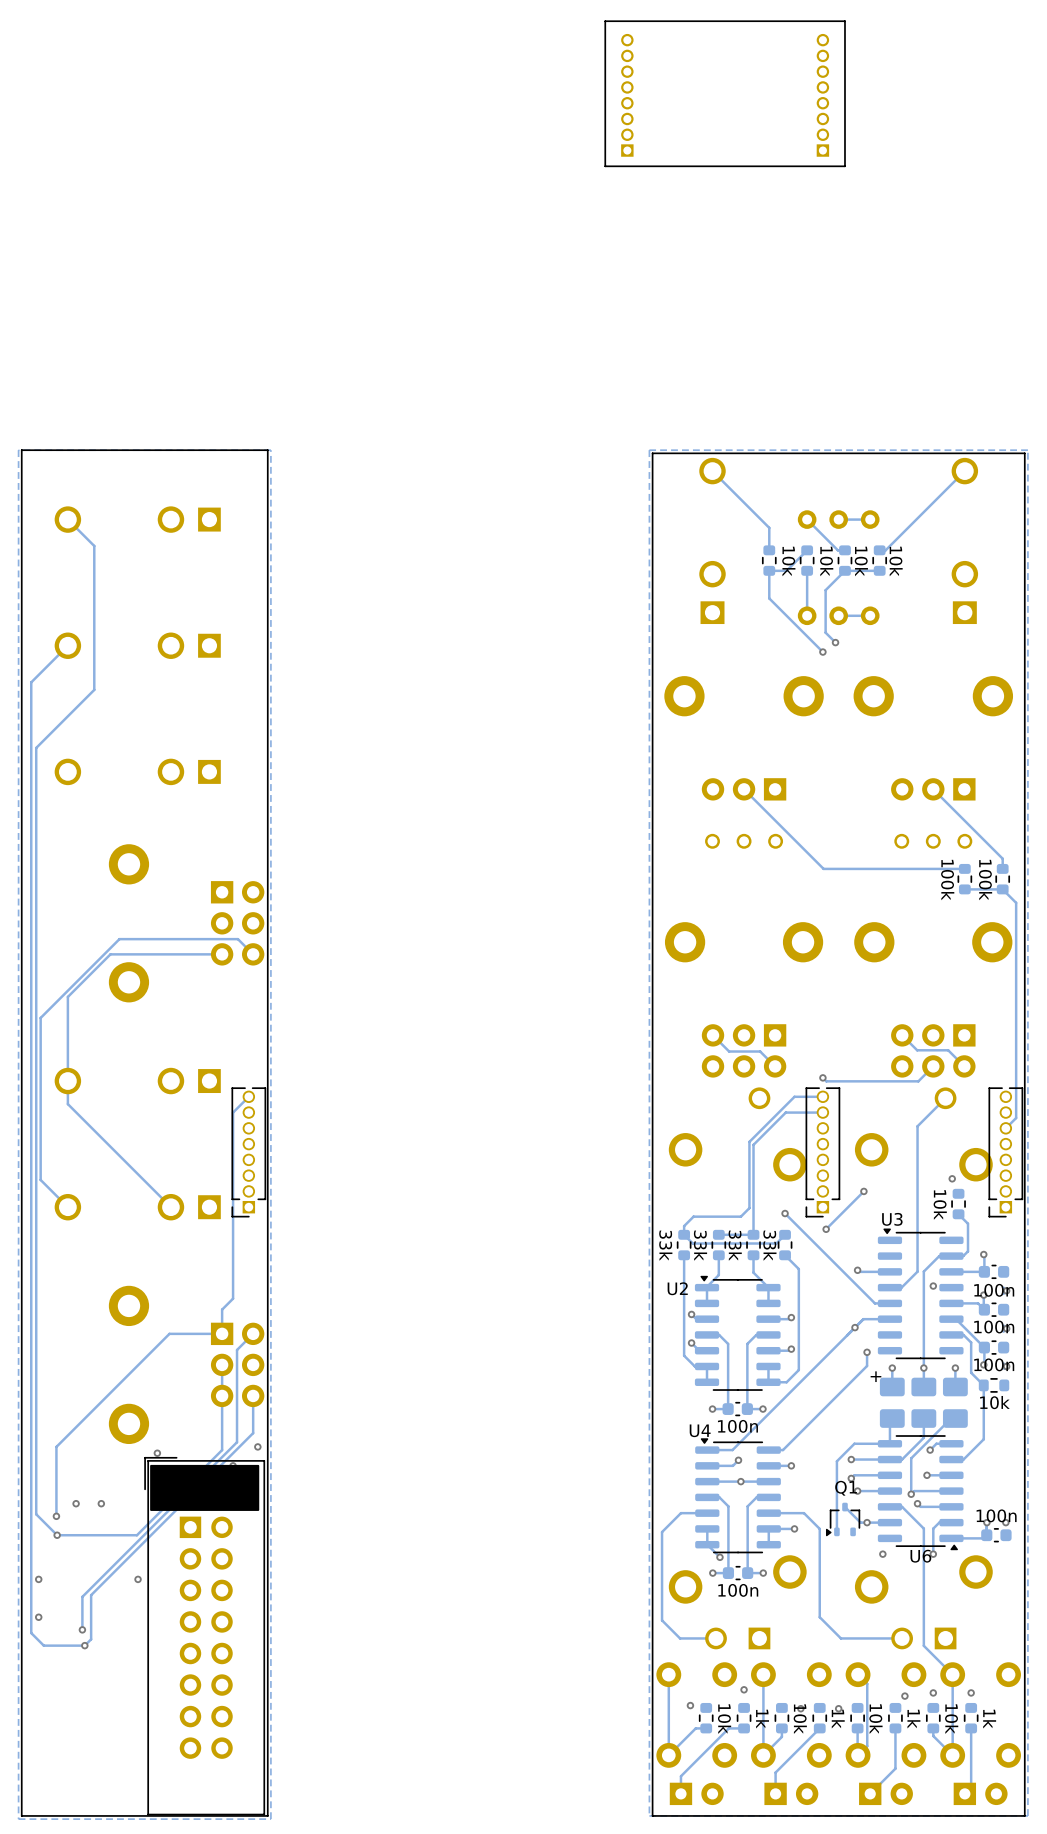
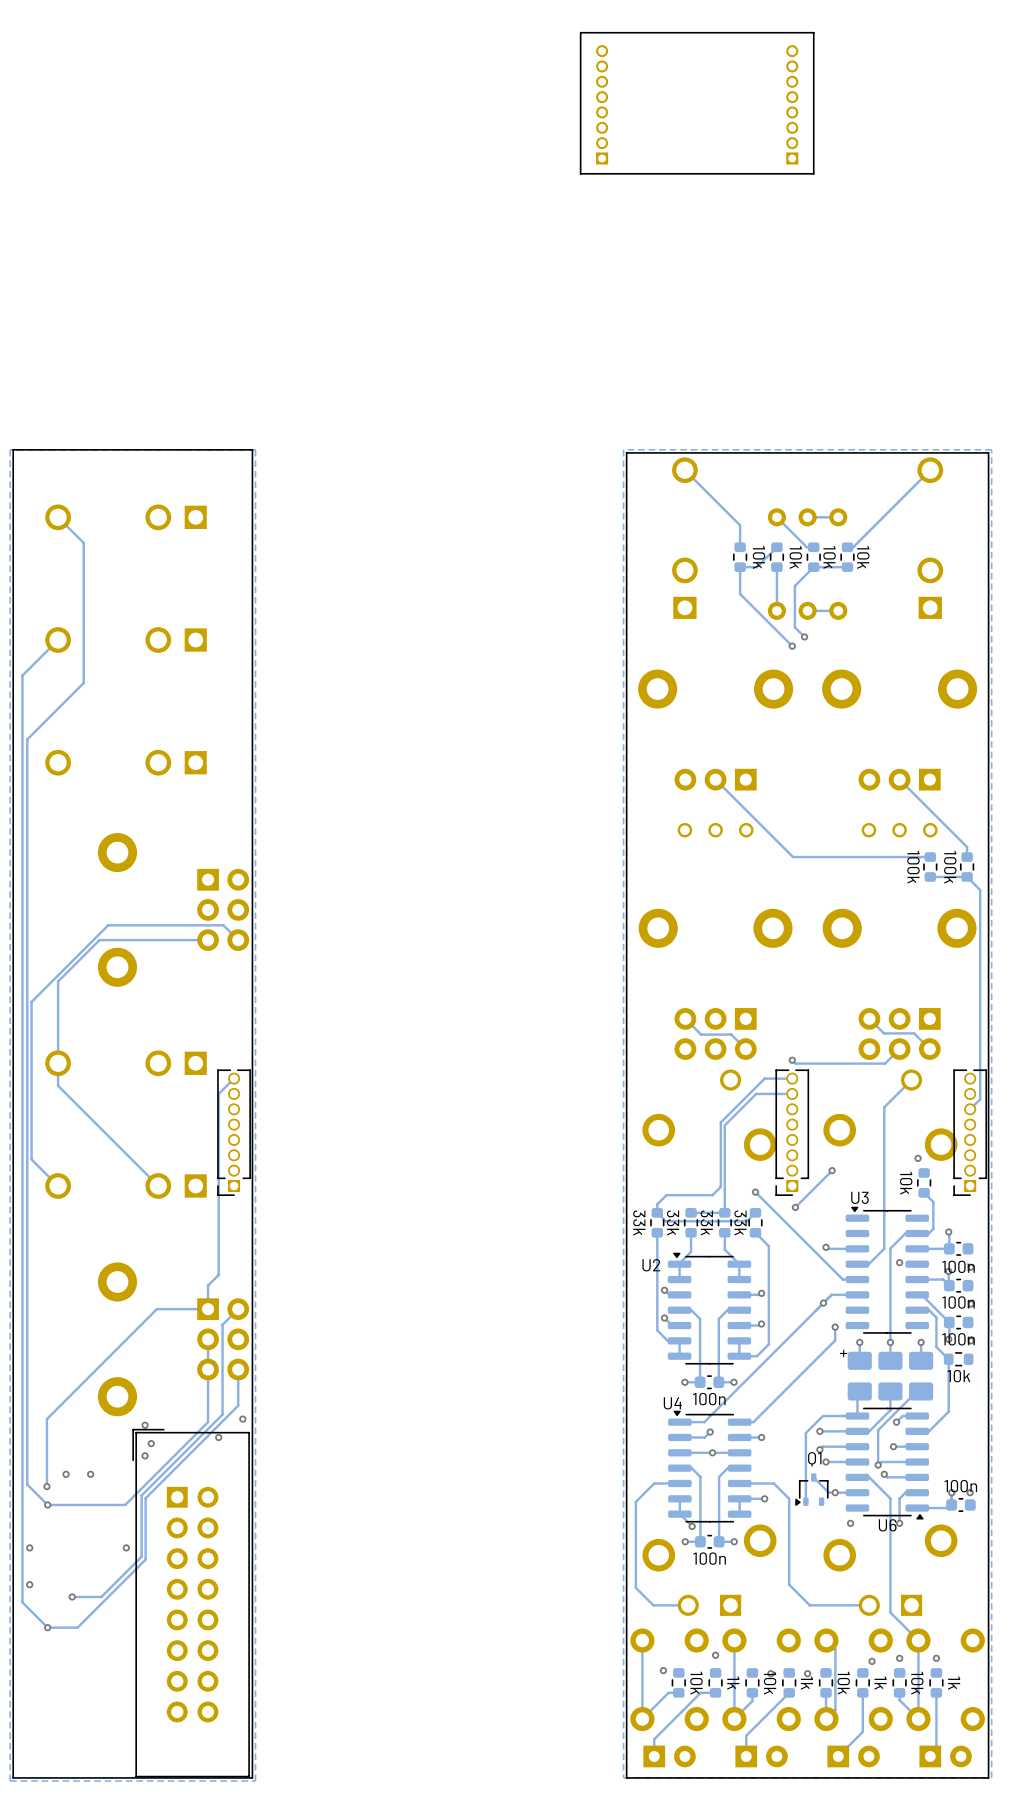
drawing: [150, 1464, 260, 1511] -> none
track: (153, 1525) (82, 1596) (82, 1629) -> (141, 1495) (141, 1556) (101, 1596) (72, 1596)
track: (157, 1528) (91, 1595) (91, 1639) (84, 1645) (43, 1645) (31, 1633) -> (145, 1498) (145, 1559) (77, 1627) (47, 1627) (22, 1602) (22, 1600)
via position: (84, 1645) -> (47, 1627)

